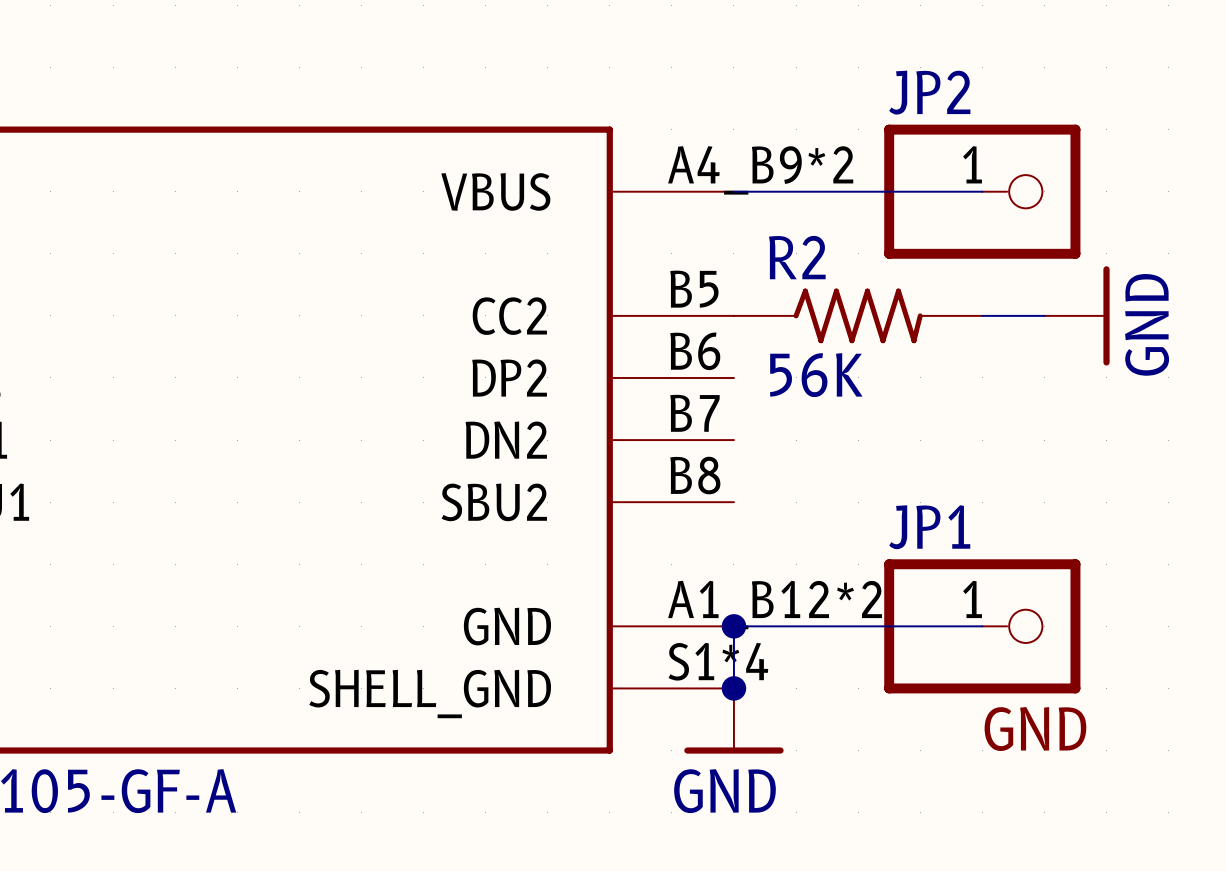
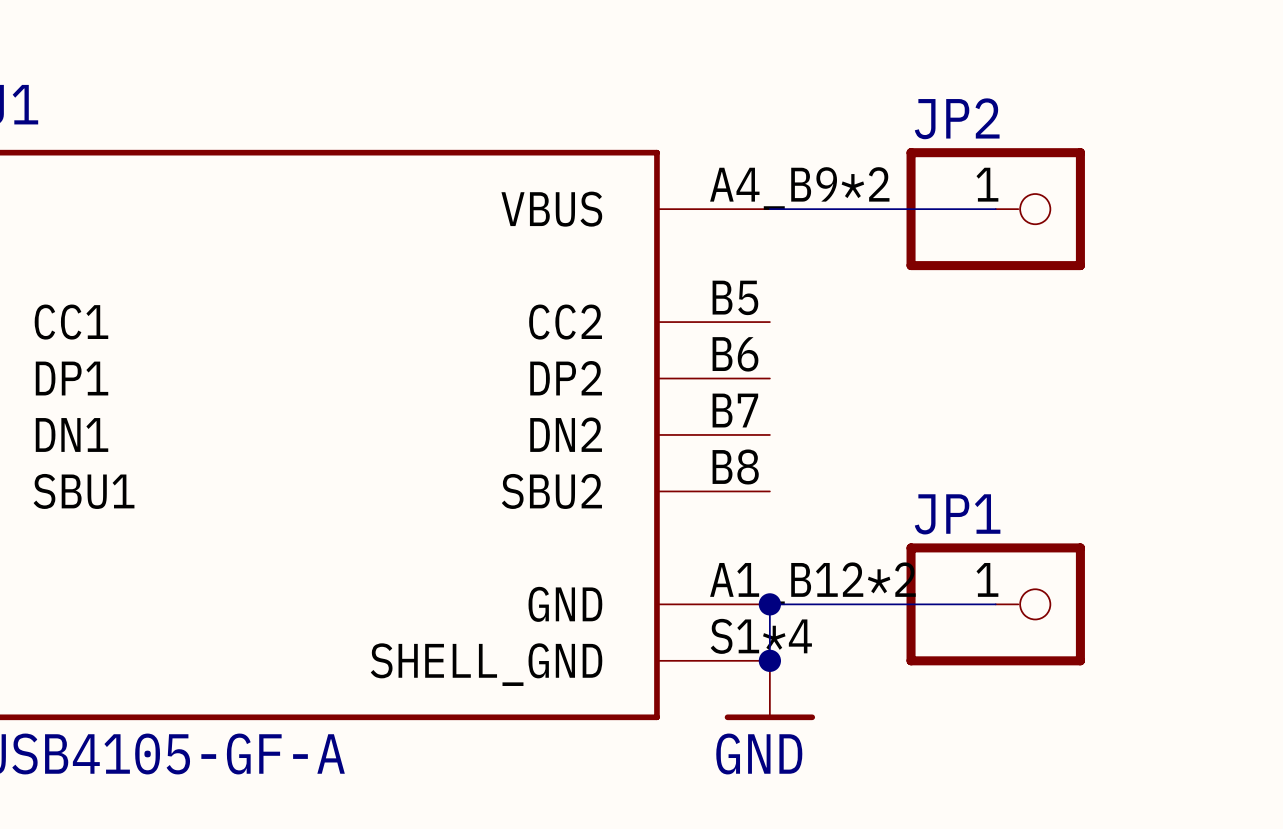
R2: 56K (858, 315) -> none
wire: (982, 315) (1044, 315) -> none
power symbol: GND (1077, 315) -> none
label: GND (1035, 729) -> none

